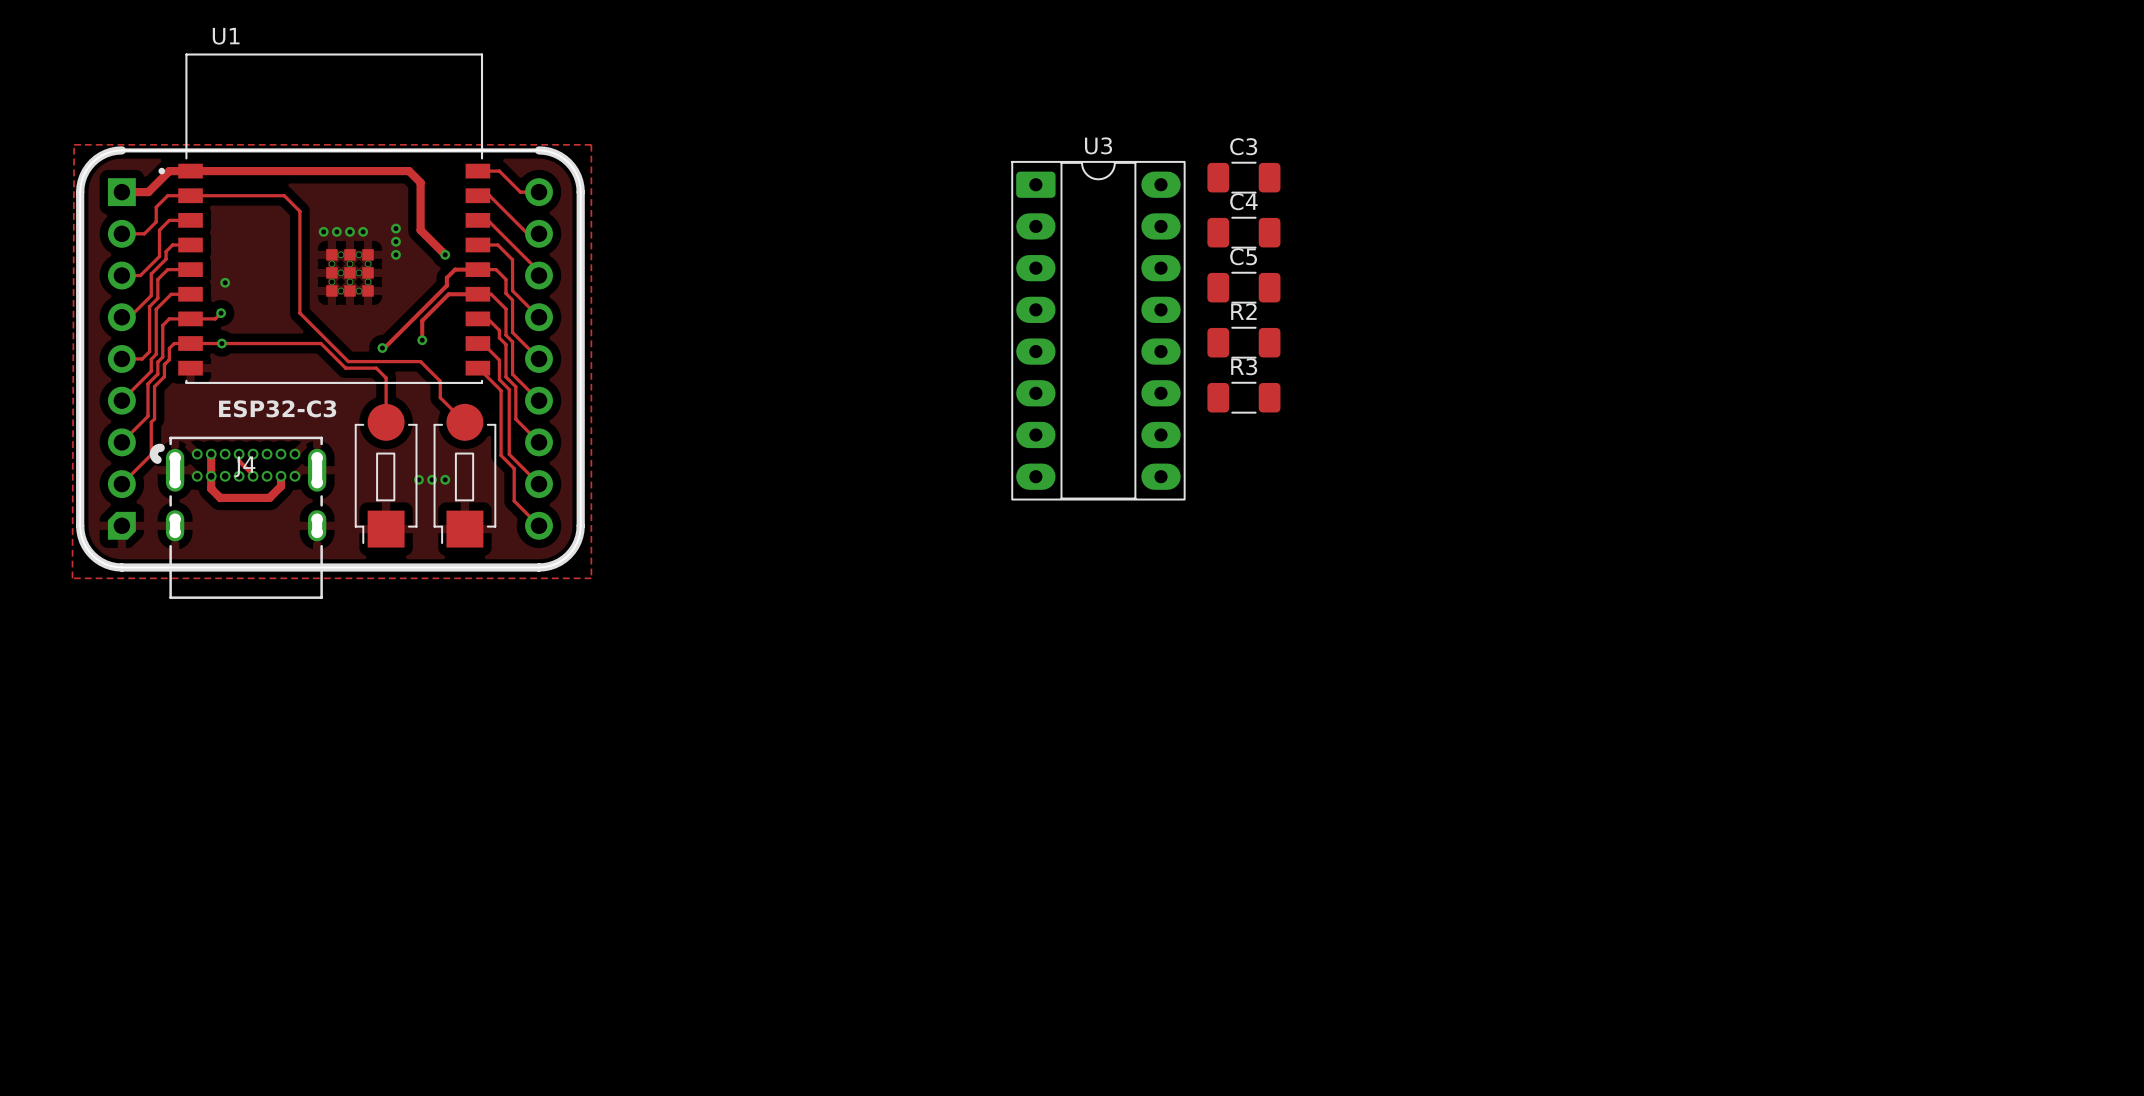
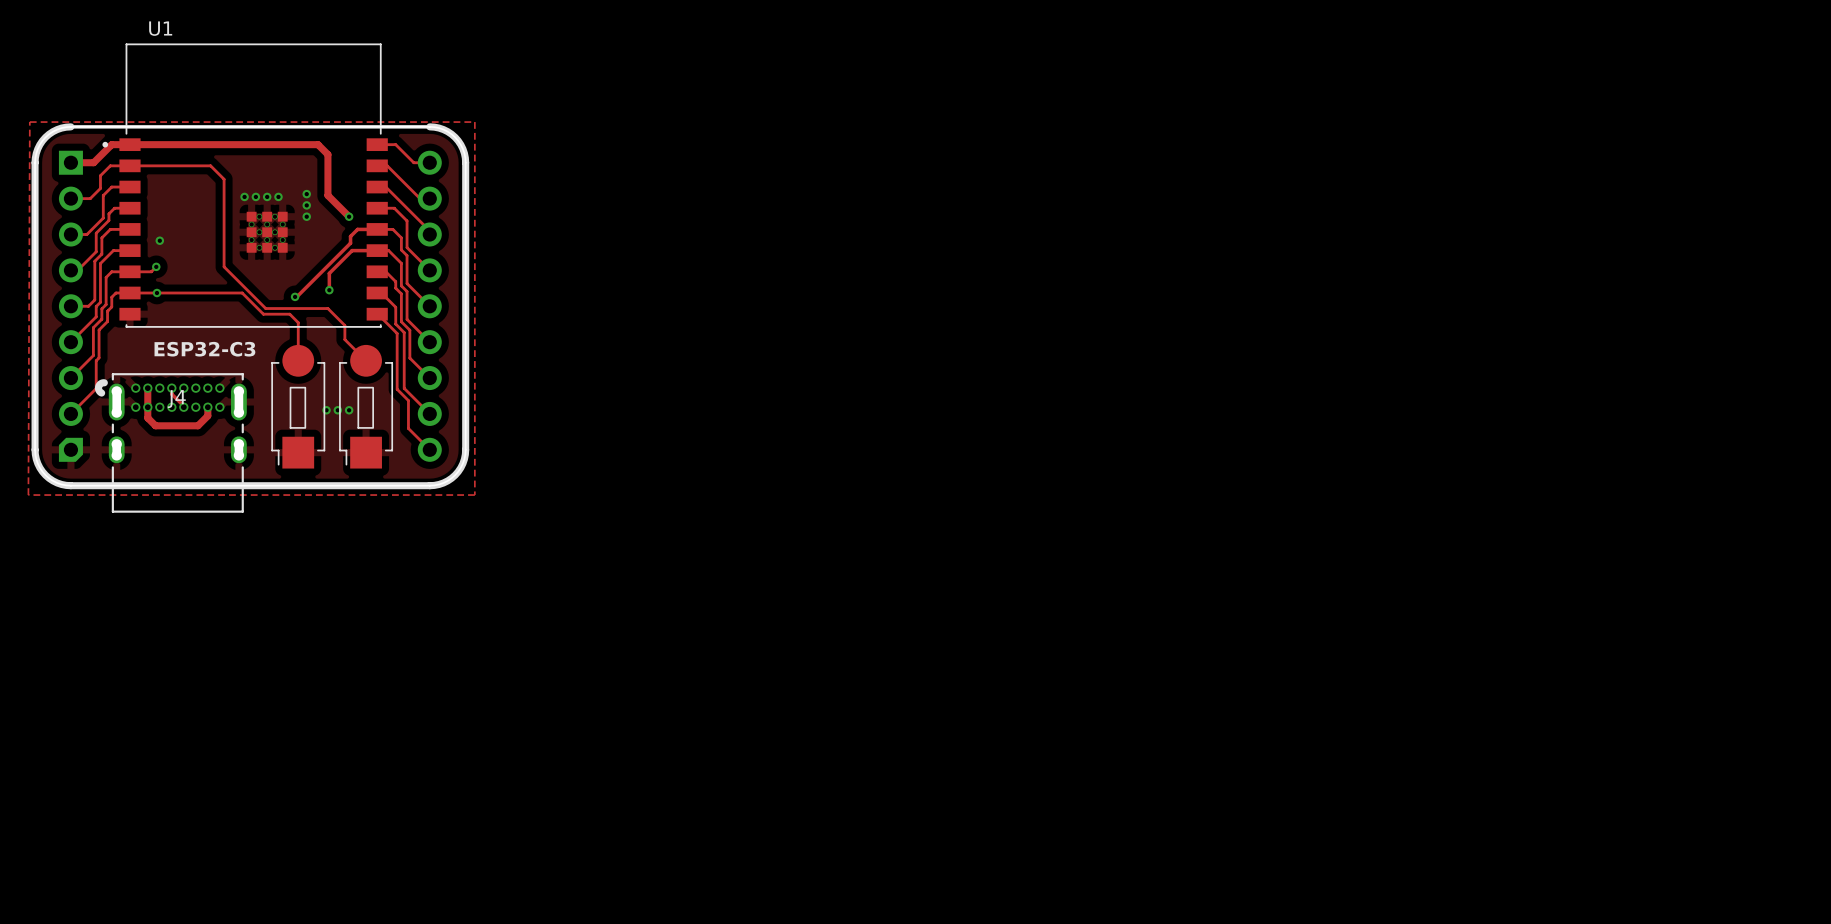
C3: (1243, 177) -> none
C4: (1243, 232) -> none
C5: (1243, 287) -> none
U3: (1098, 330) -> none
R2: (1243, 342) -> none
R3: (1243, 397) -> none

